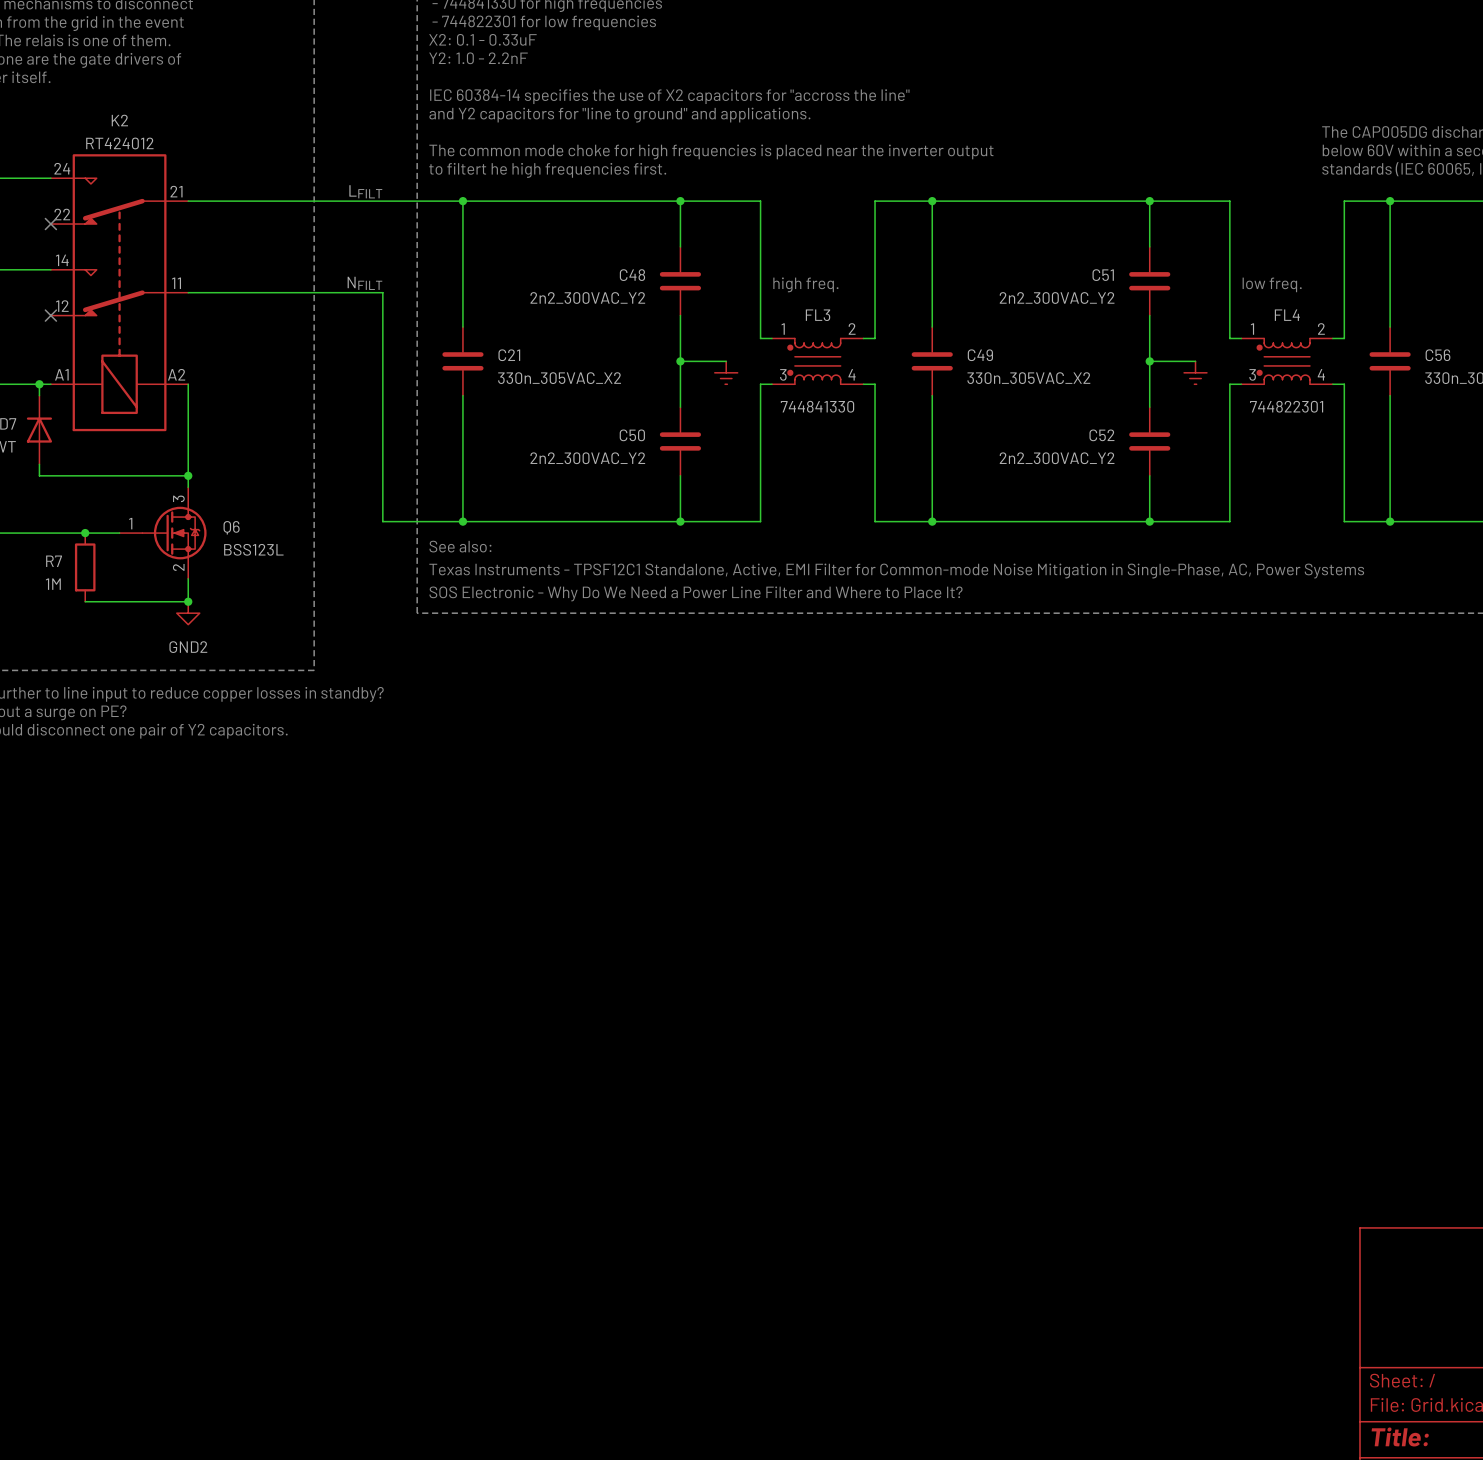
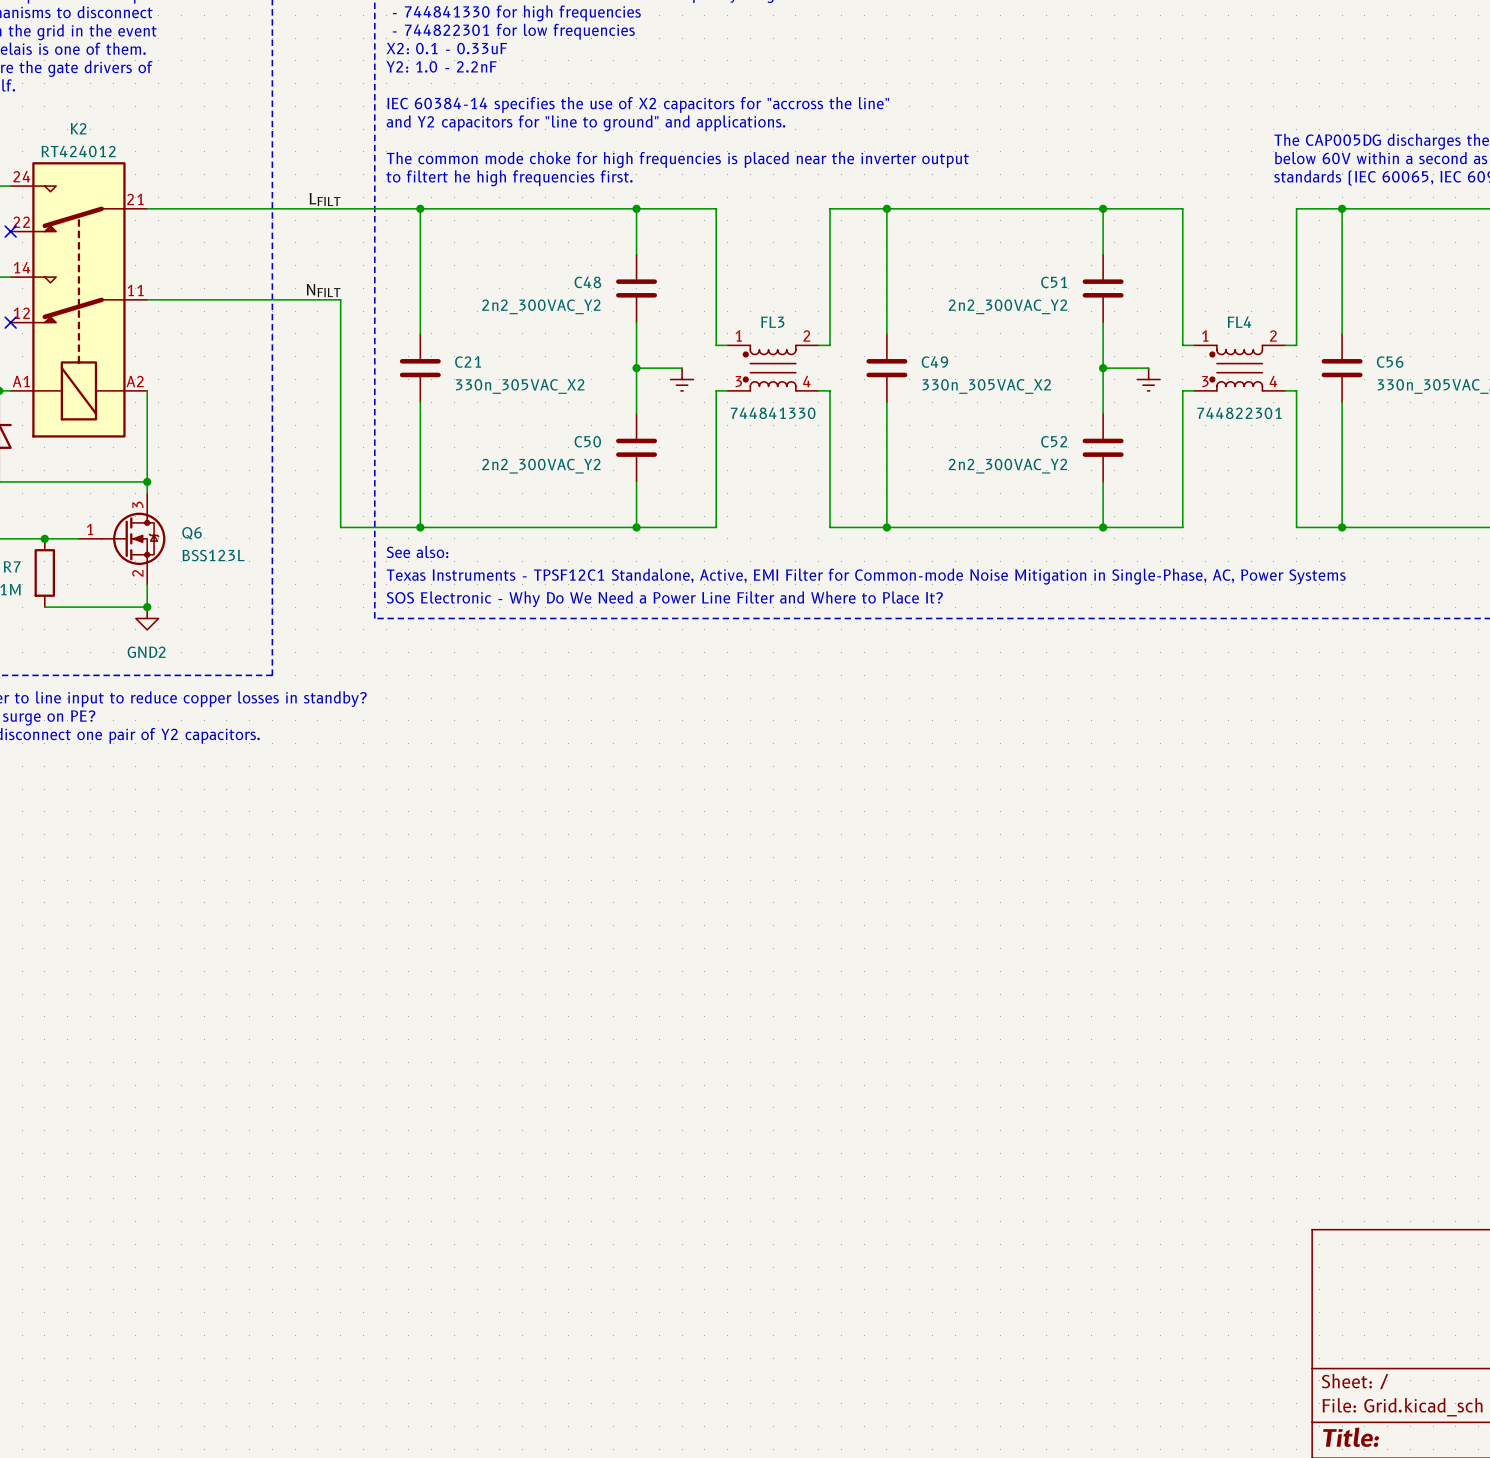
text: high freq. (805, 284) -> none
text: low freq. (1272, 284) -> none

